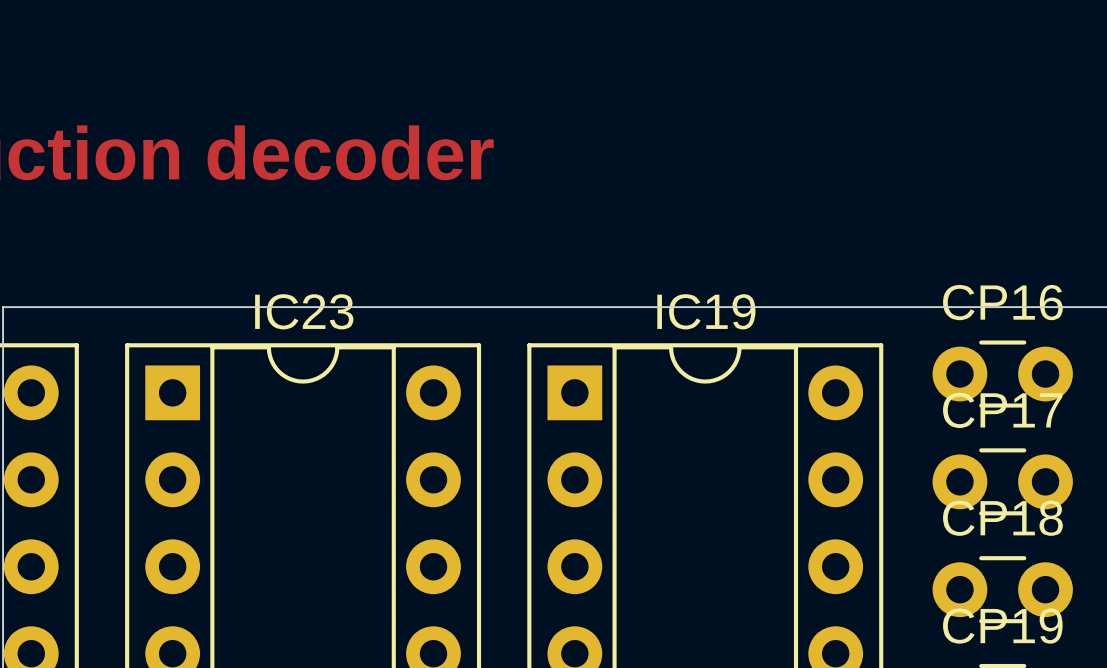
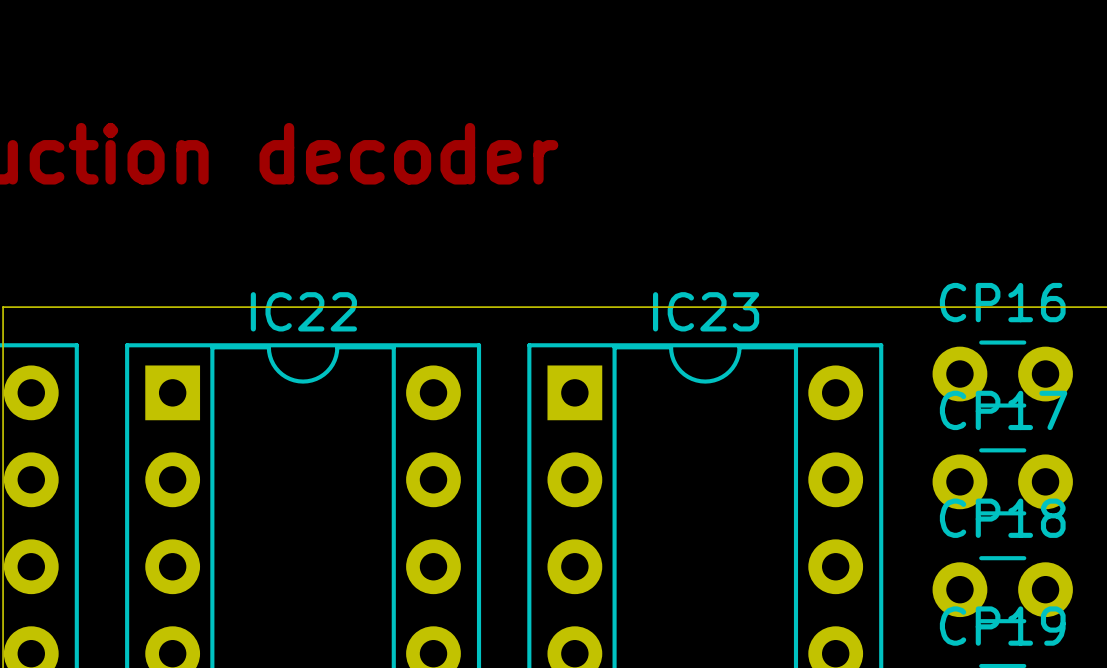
IC23 name: IC23 (304, 311) -> IC22 (303, 311)
IC19 name: IC19 (706, 311) -> IC23 (706, 311)

